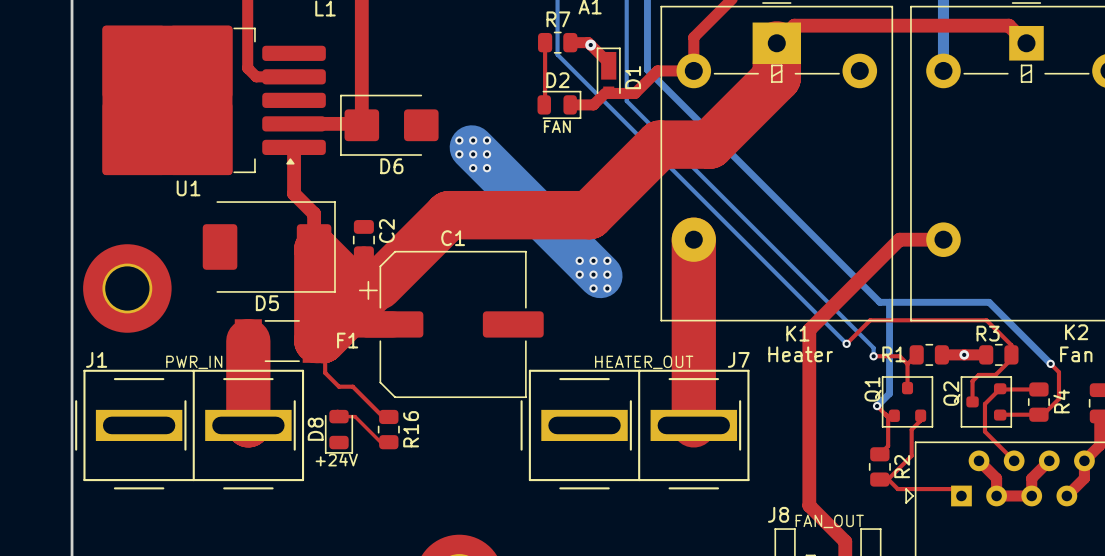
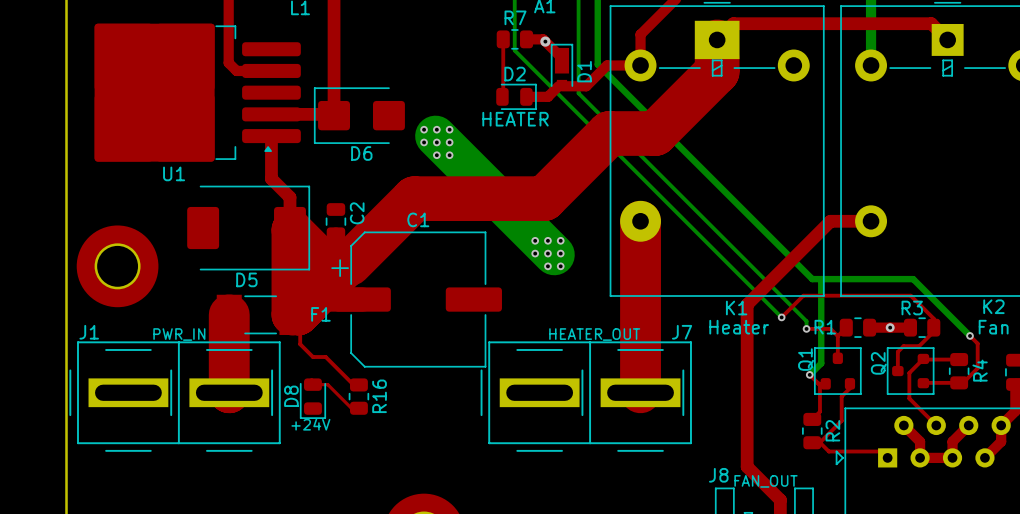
text: FAN (557, 126) -> none
text: none -> HEATER (515, 119)

